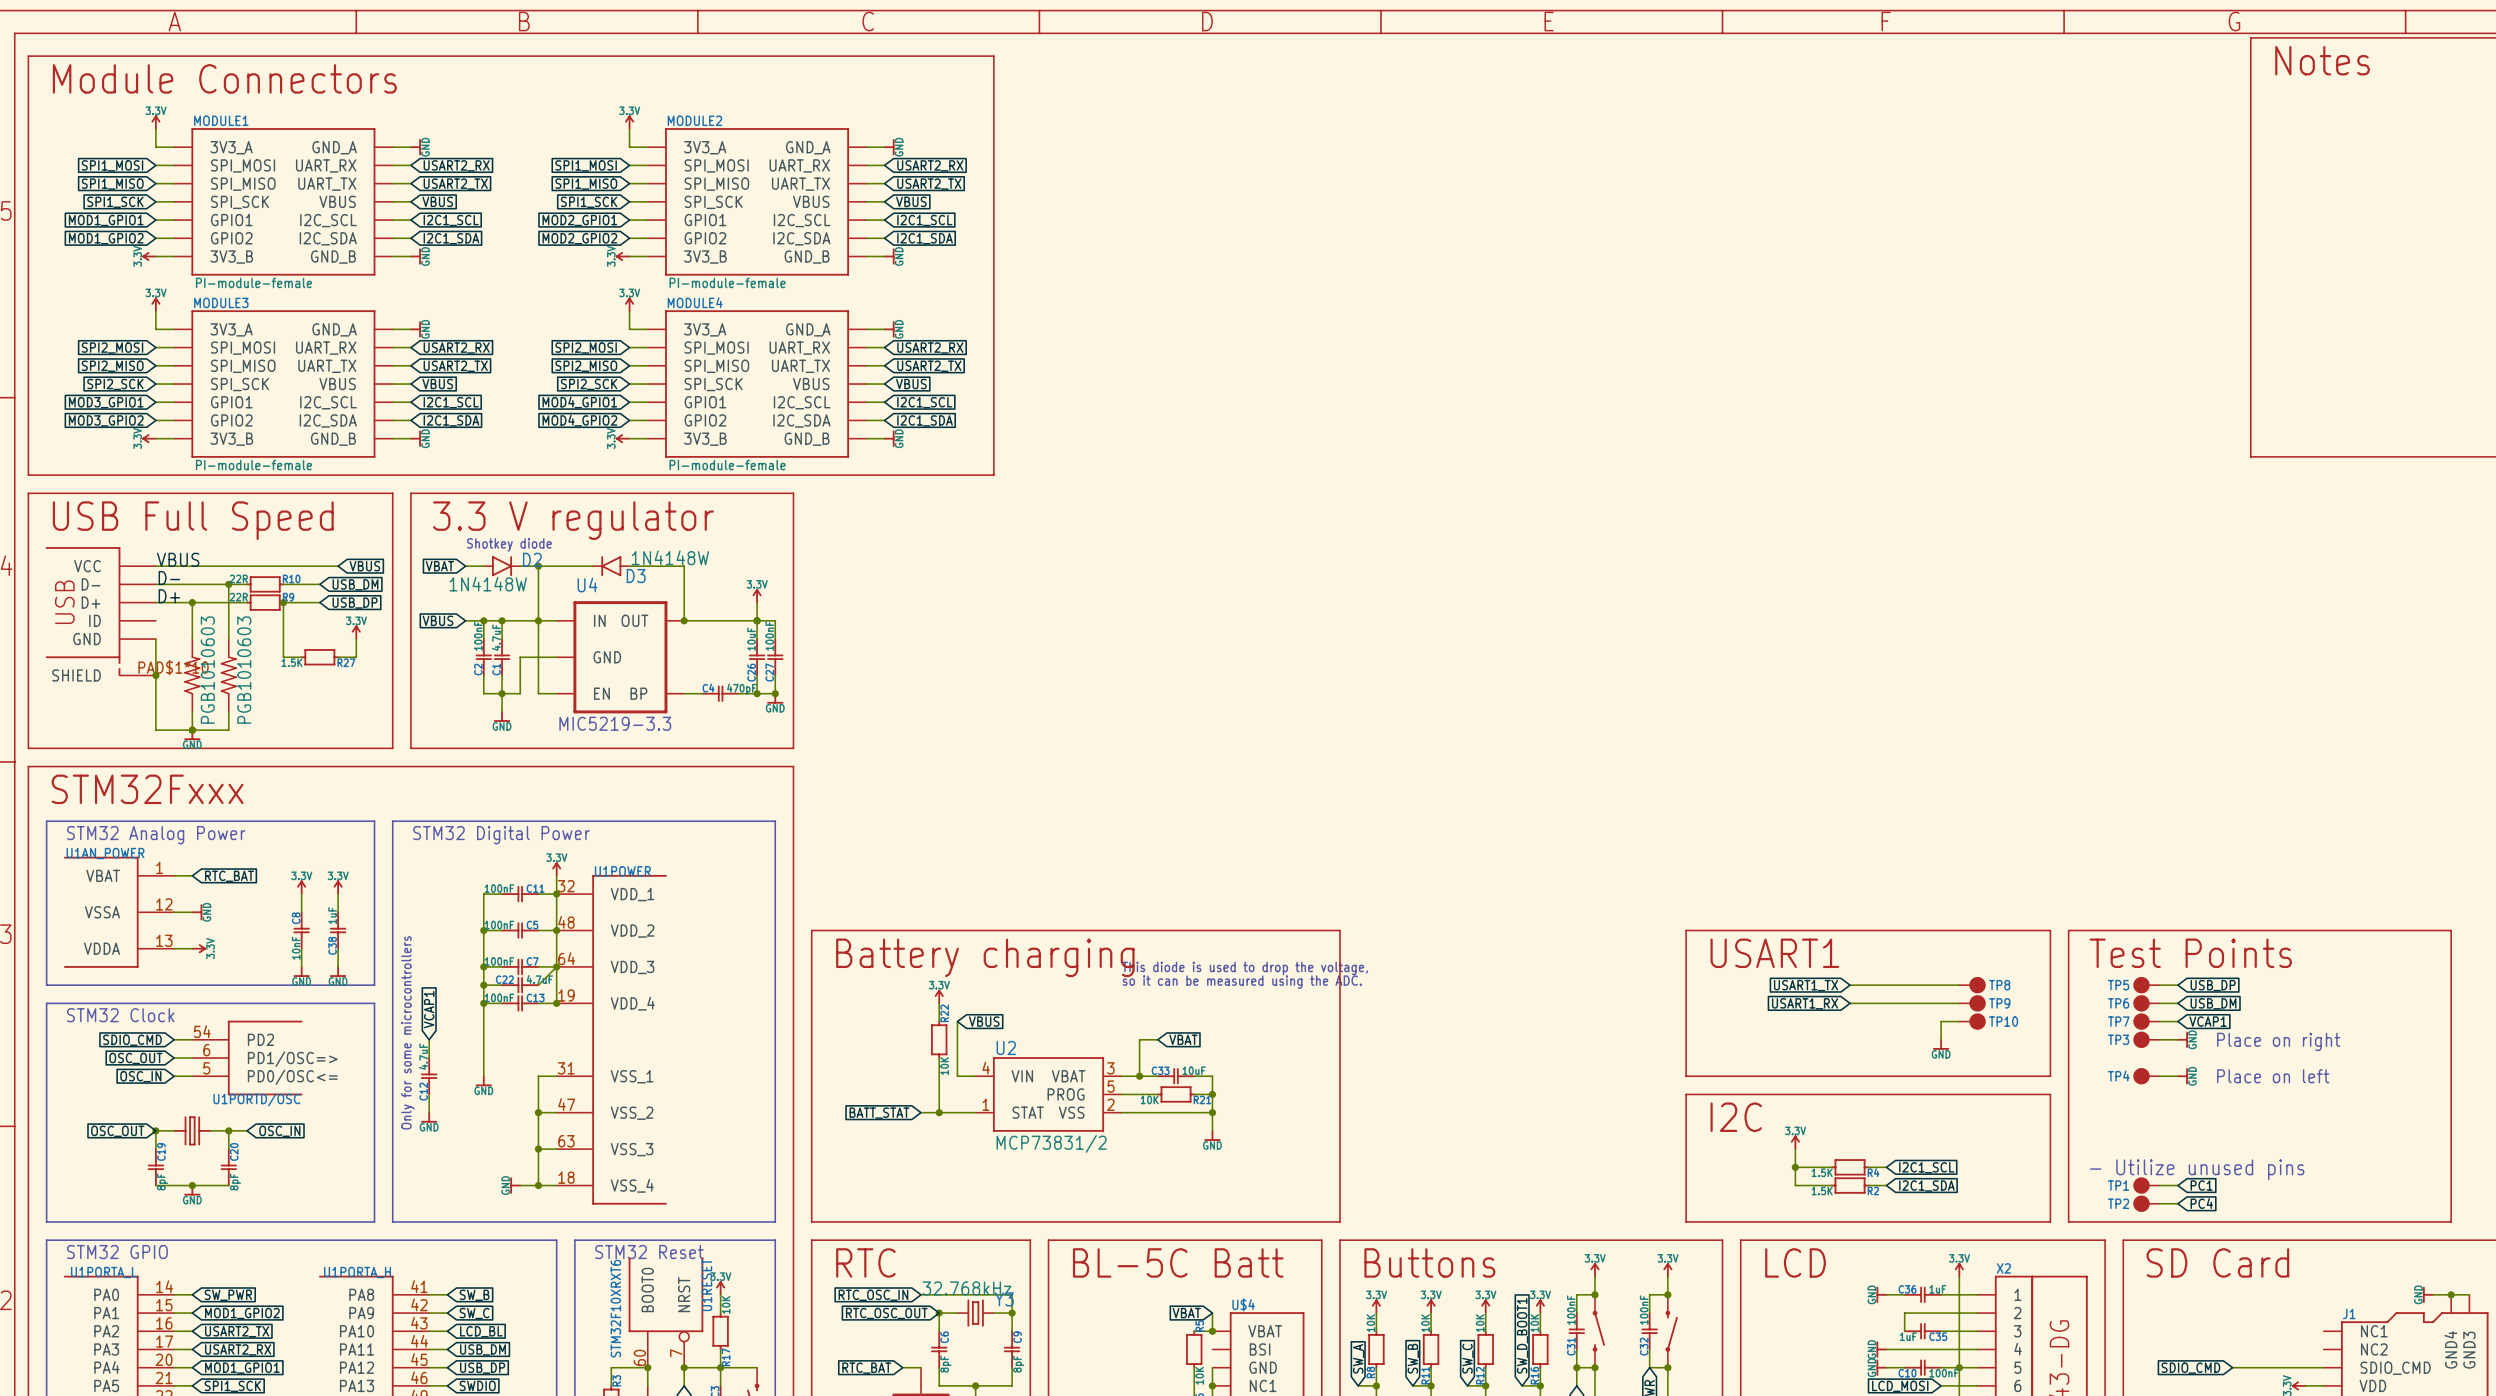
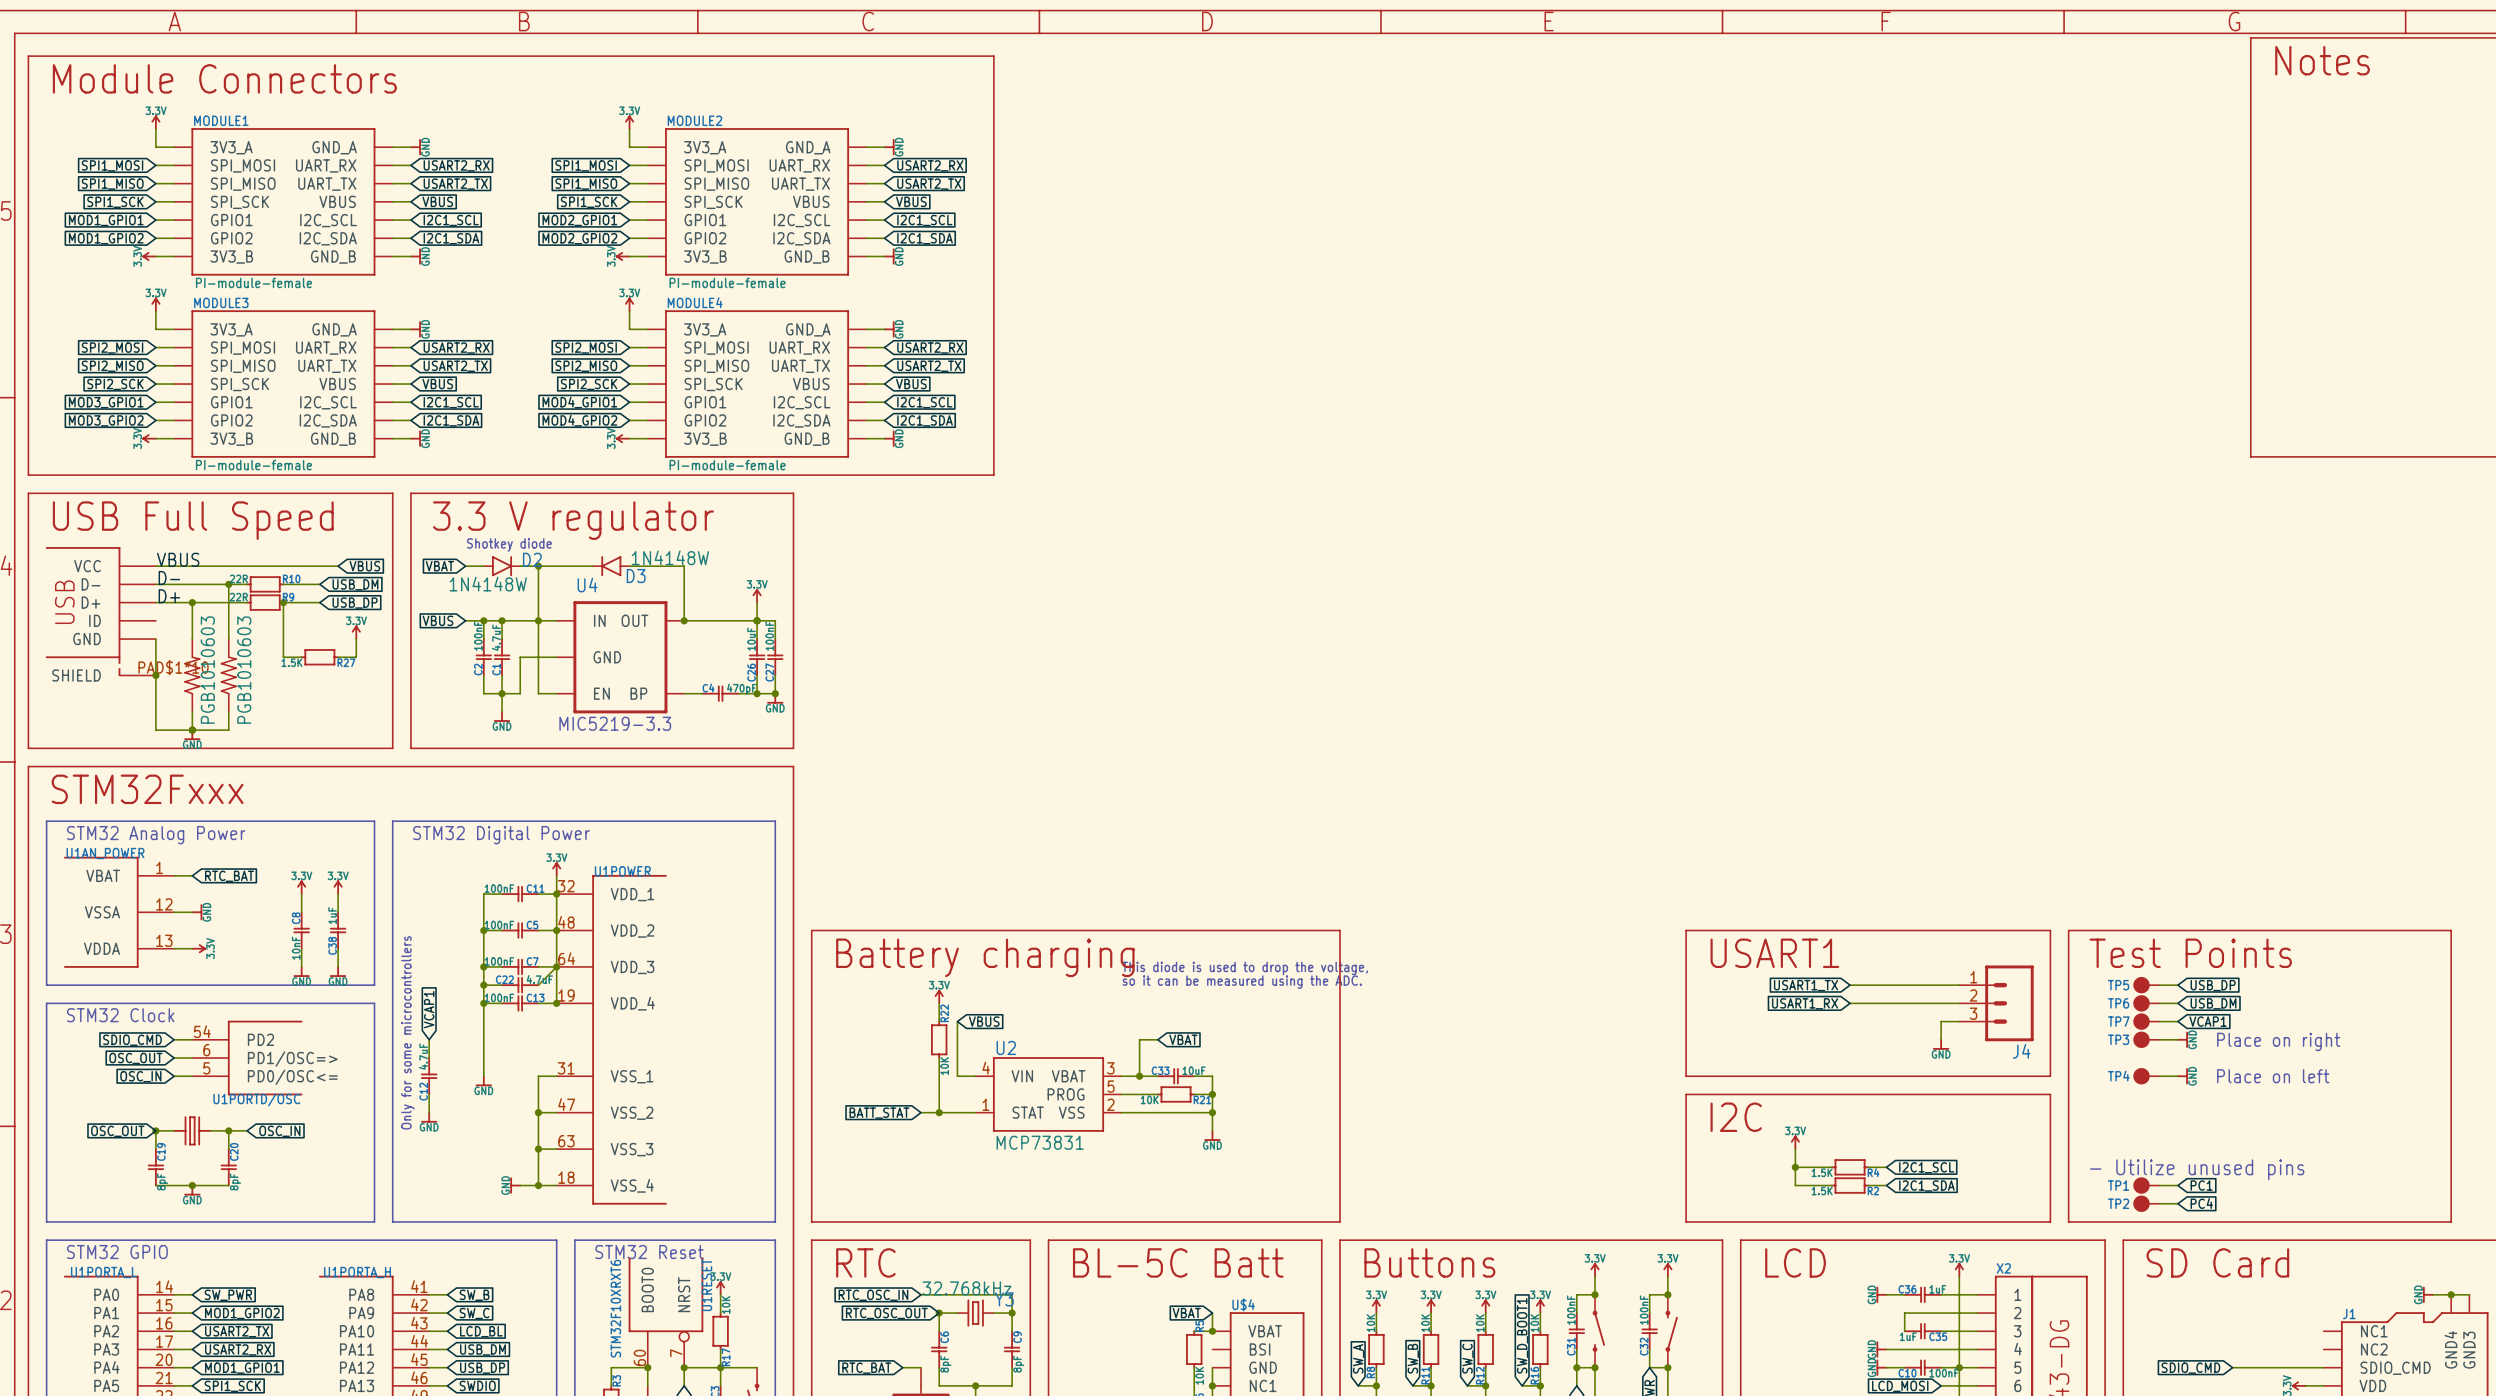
TP8: (1972, 985) -> none
TP9: (1972, 1003) -> none
J4: none -> (1996, 1003)
TP10: (1972, 1021) -> none
U2 value: MCP73831/2 (1051, 1143) -> MCP73831 (1040, 1142)

